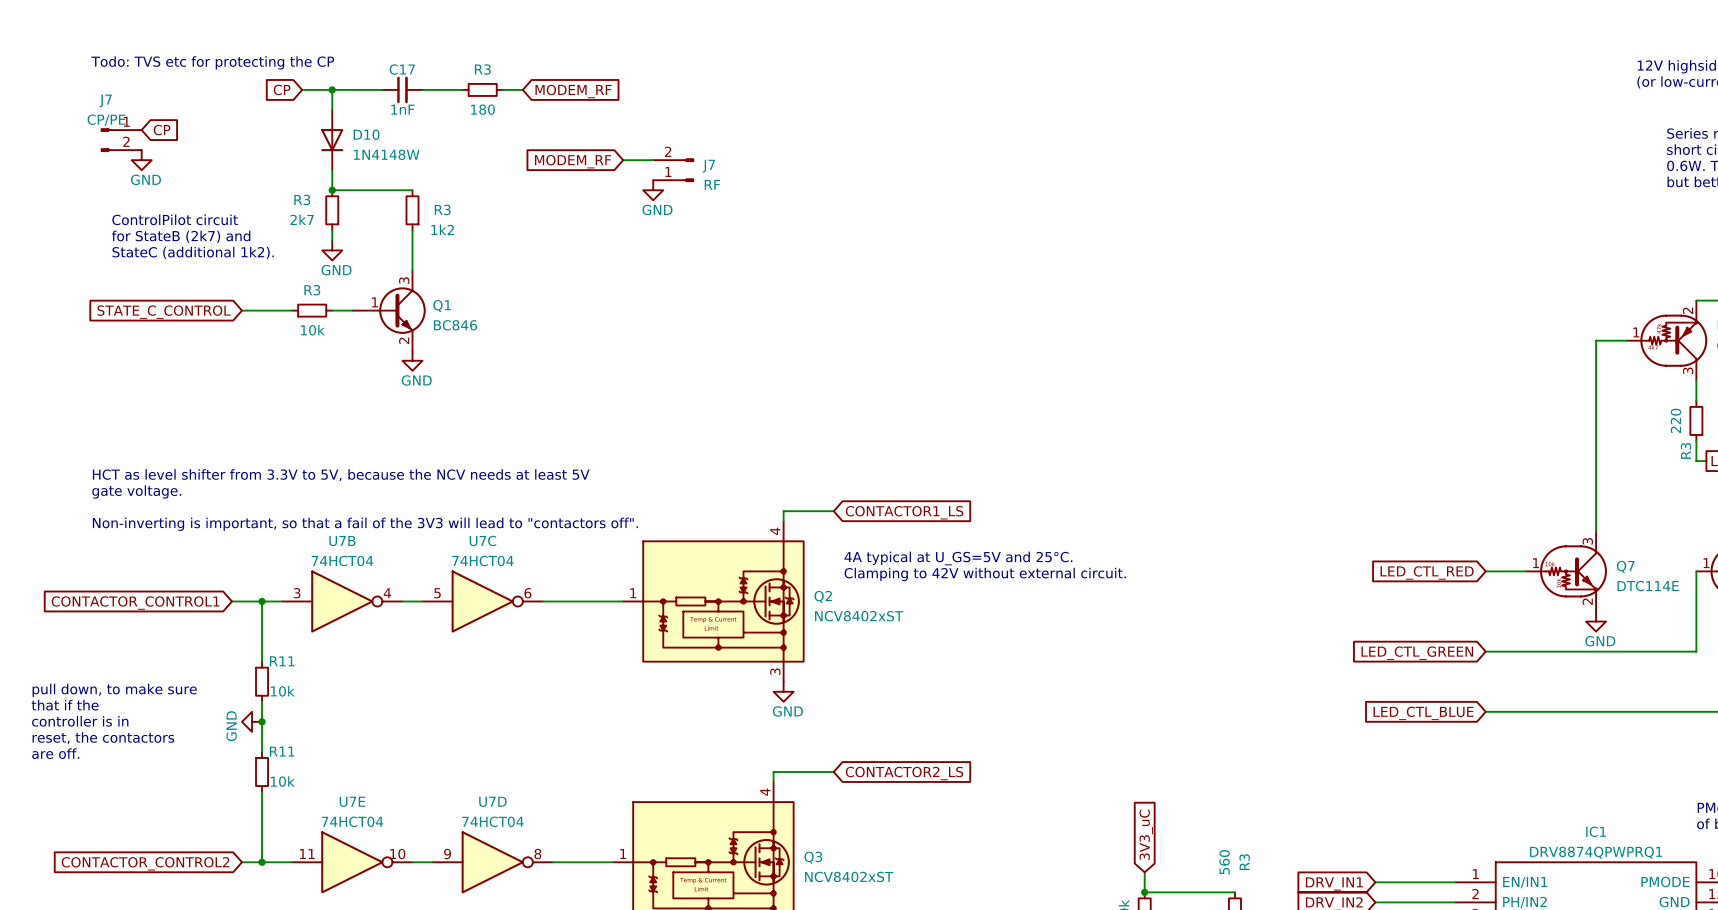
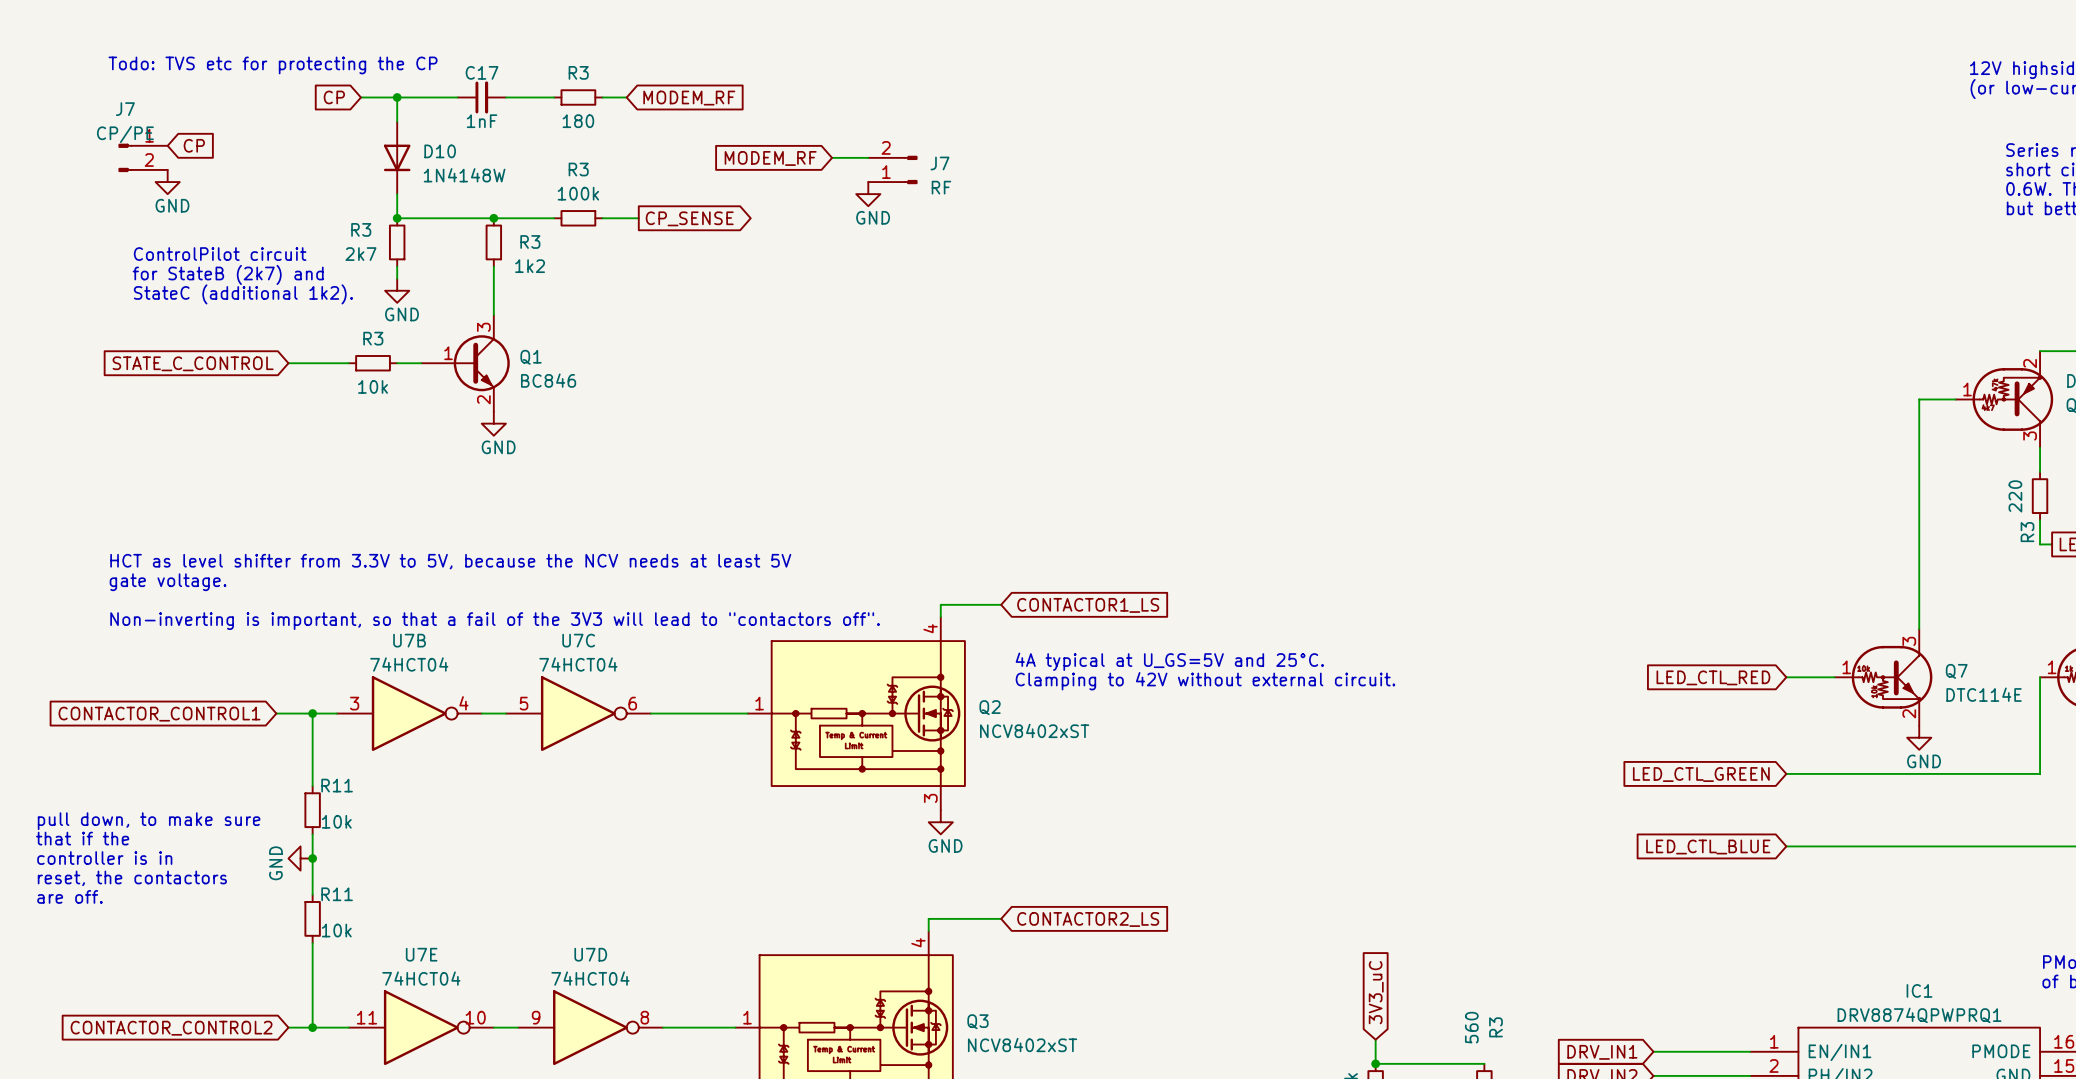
wire: (623, 160) (653, 160) -> (832, 157) (868, 157)
global label position: MODEM_RF (573, 161) -> MODEM_RF (770, 158)
J7 position: (673, 170) -> (892, 169)
wire: none -> (493, 218) (554, 218)
junction: none -> (493, 218)
R3: none -> 100k (578, 218)
wire: none -> (602, 218) (638, 218)
power symbol position: GND (653, 190) -> GND (868, 194)
global label: none -> CP_SENSE (689, 218)

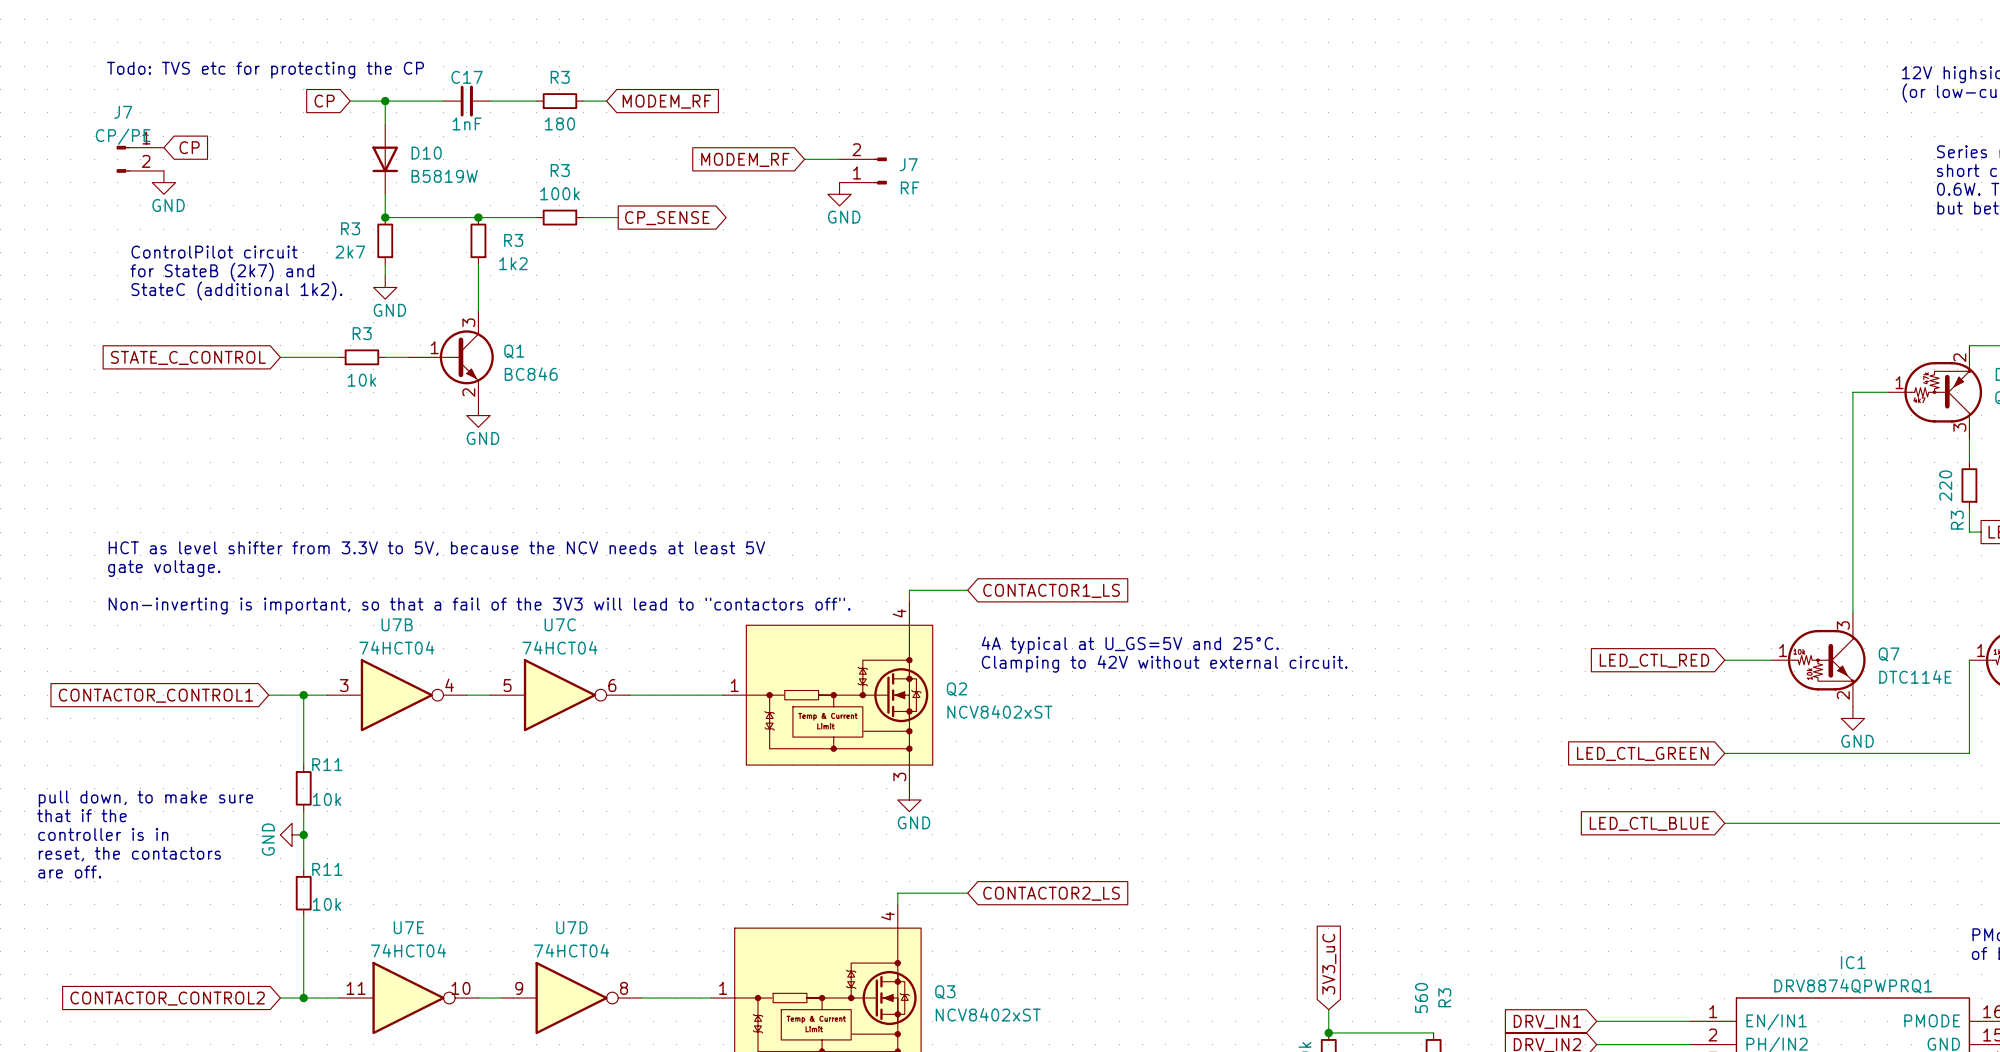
D10 value: 1N4148W (464, 175) -> B5819W (444, 176)

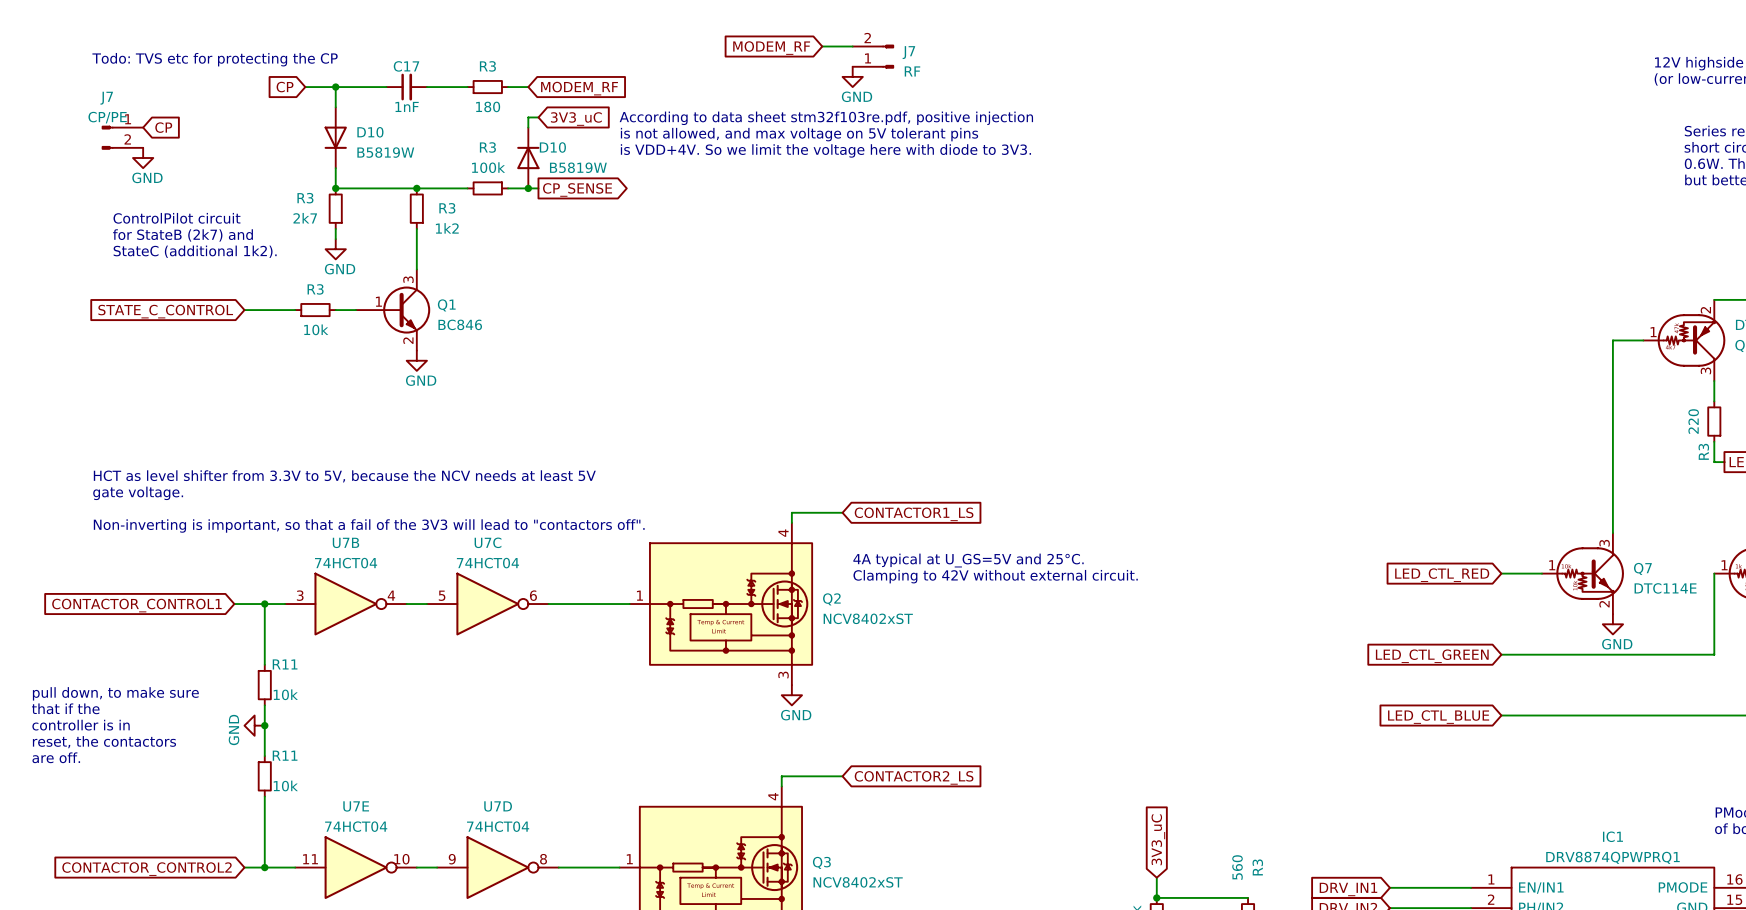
wire: none -> (538, 117) (528, 117) (528, 127)
global label: none -> 3V3_uC (576, 119)
text: none -> According to data sheet stm32f103re.pdf, positive injection (826, 118)
text: none -> is not allowed, and max voltage on 5V tolerant pins (799, 134)
global label position: MODEM_RF (745, 159) -> MODEM_RF (771, 48)
wire: (804, 159) (839, 159) -> (822, 46) (852, 46)
J7 position: (863, 170) -> (873, 56)
text: none -> is VDD+4V. So we limit the voltage here with diode to 3V3. (825, 150)
D10: none -> B5819W (528, 158)
power symbol position: GND (839, 194) -> GND (852, 76)
junction: none -> (528, 188)

